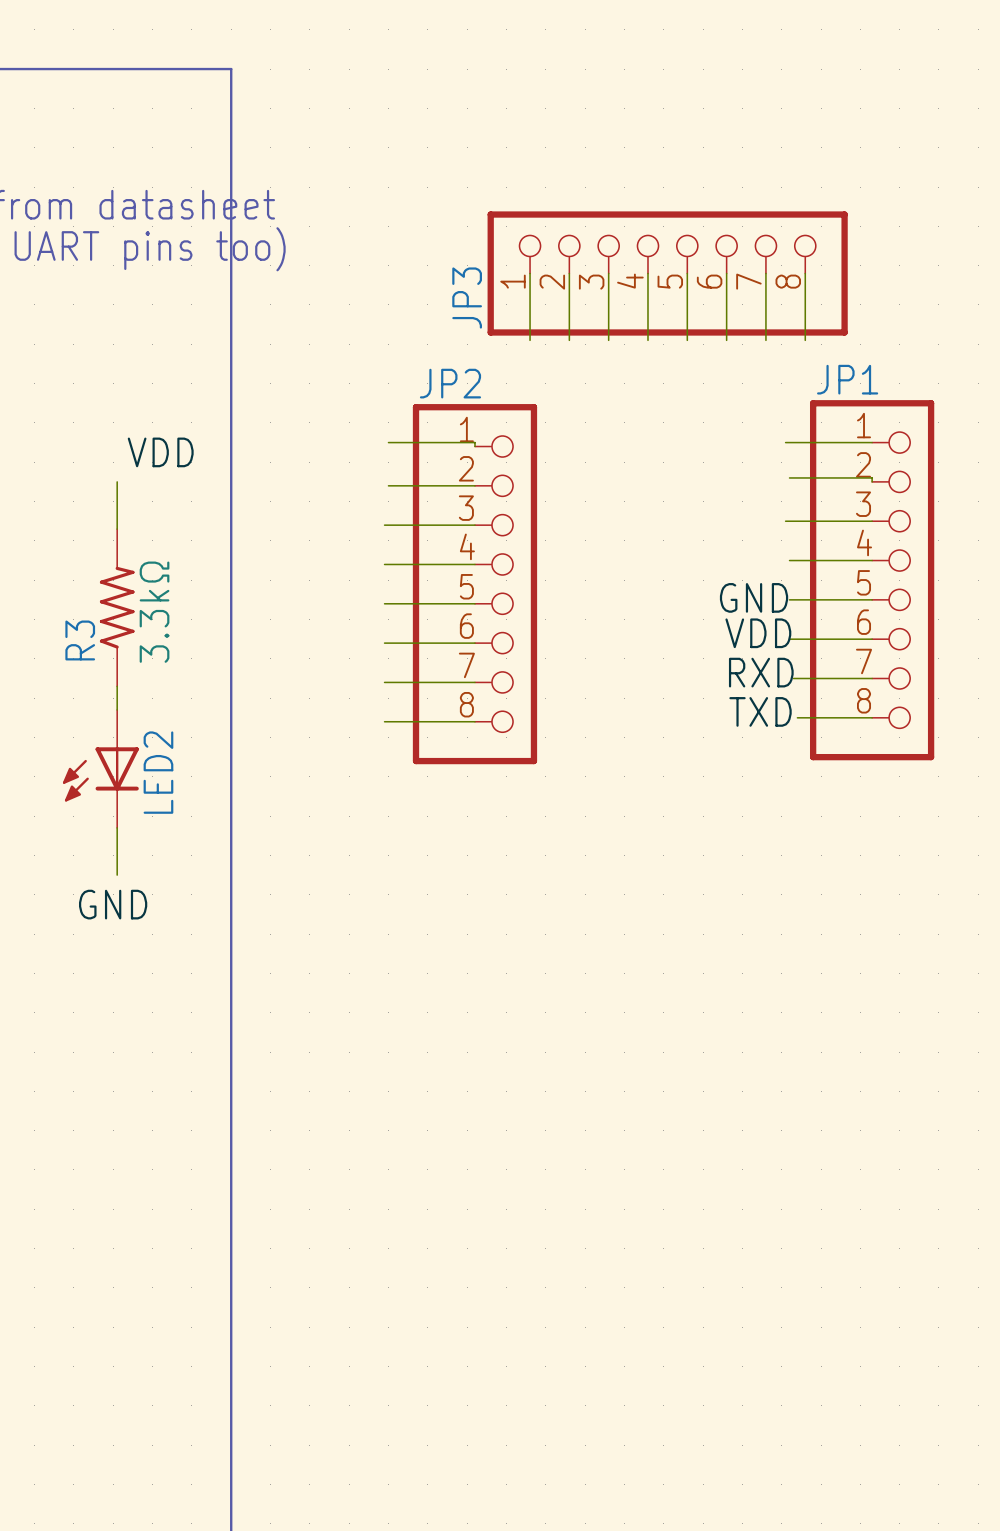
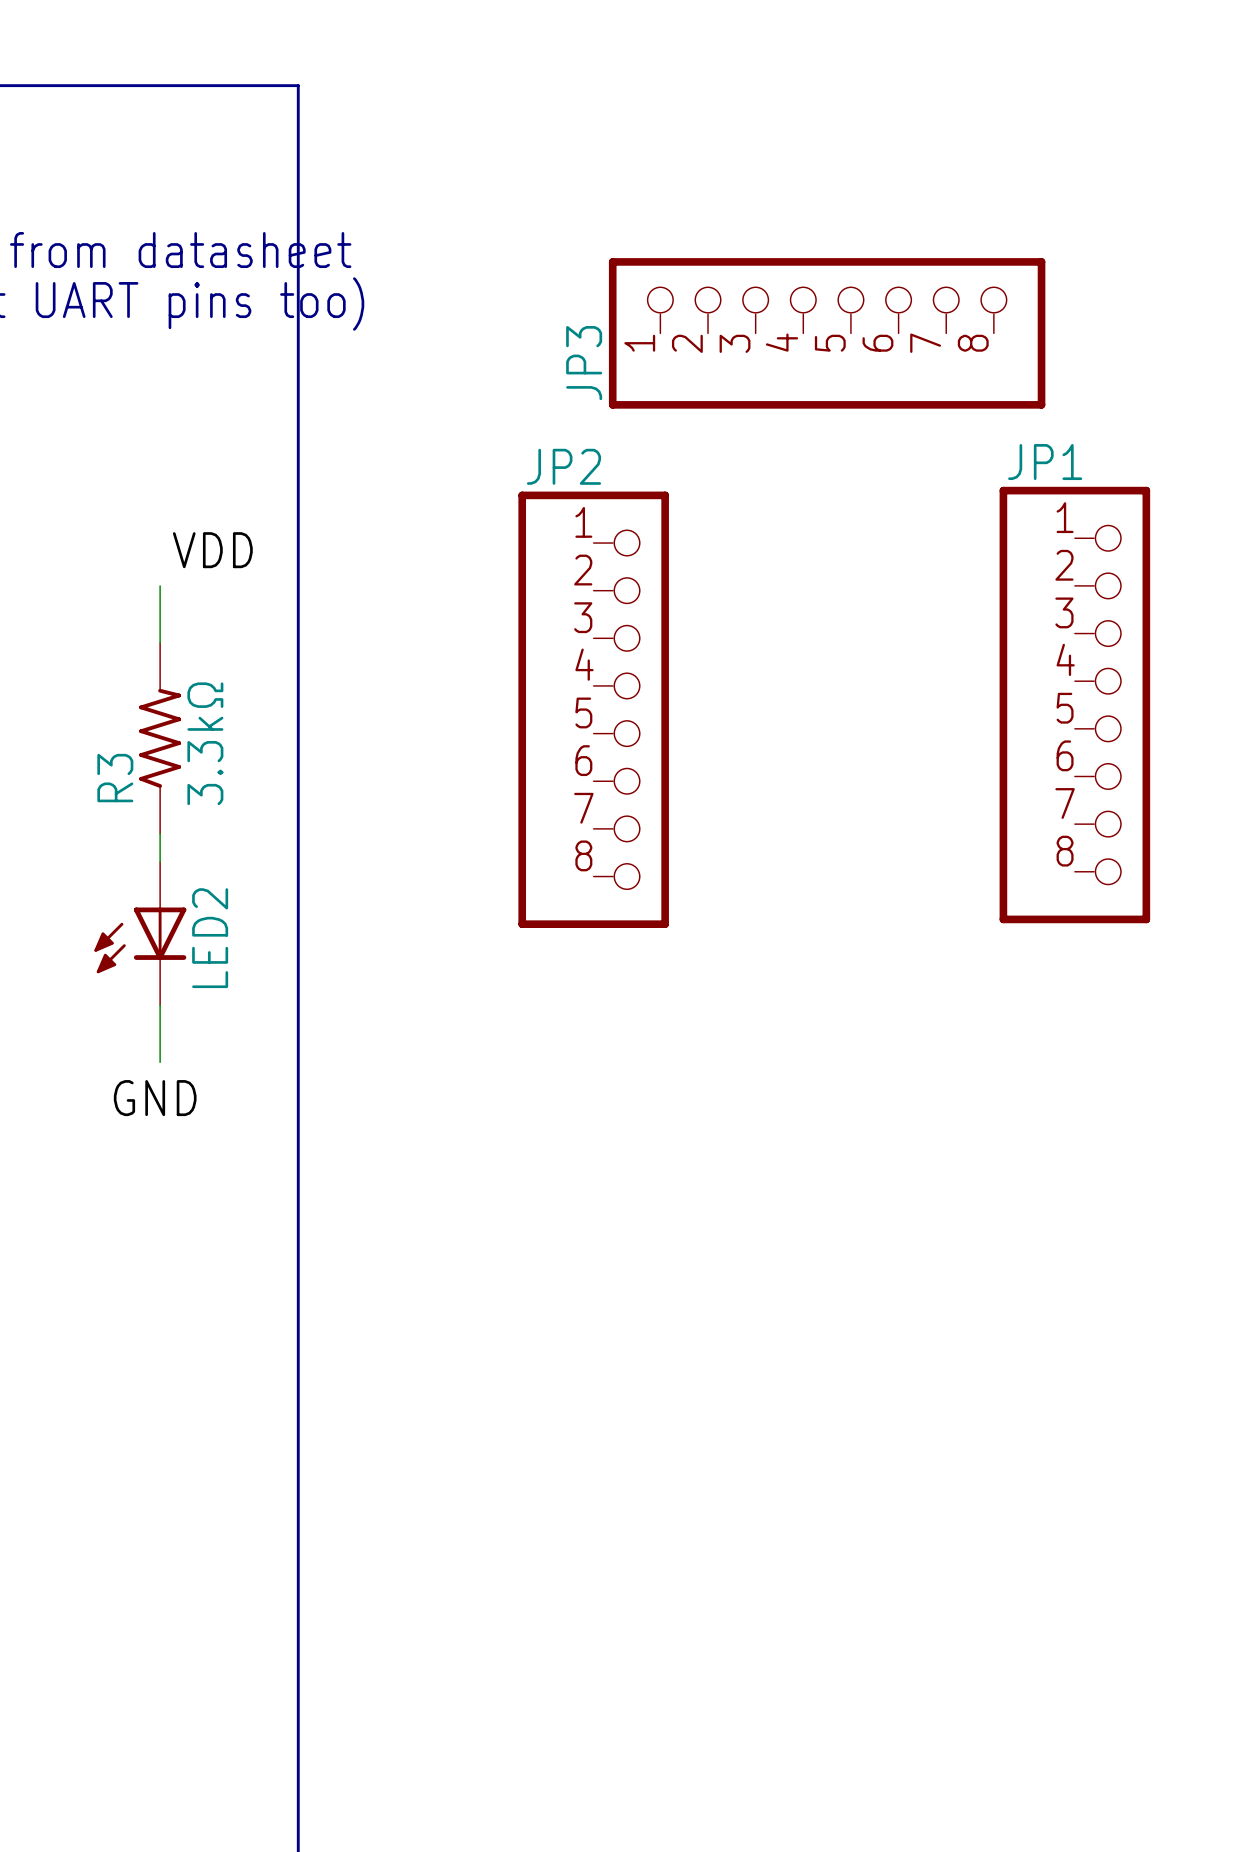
wire: (530, 273) (530, 340) -> none
wire: (569, 273) (569, 340) -> none
wire: (608, 273) (608, 340) -> none
wire: (647, 273) (647, 340) -> none
wire: (687, 273) (687, 340) -> none
wire: (726, 273) (726, 340) -> none
wire: (765, 273) (765, 340) -> none
wire: (805, 273) (805, 340) -> none
wire: (388, 442) (474, 442) (474, 446) -> none
wire: (785, 442) (872, 442) -> none
wire: (789, 477) (872, 477) (872, 481) -> none
wire: (388, 485) (474, 485) -> none
wire: (785, 521) (872, 521) -> none
wire: (384, 525) (474, 525) -> none
wire: (789, 560) (872, 560) -> none
wire: (384, 564) (474, 564) -> none
label: GND (754, 597) -> none
wire: (789, 599) (872, 599) -> none
wire: (384, 603) (474, 603) -> none
label: VDD (758, 633) -> none
wire: (789, 639) (872, 639) -> none
wire: (384, 643) (474, 643) -> none
label: RXD (761, 672) -> none
wire: (793, 678) (872, 678) -> none
wire: (384, 682) (474, 682) -> none
label: TXD (760, 711) -> none
wire: (797, 717) (872, 717) -> none
wire: (384, 721) (474, 721) -> none

